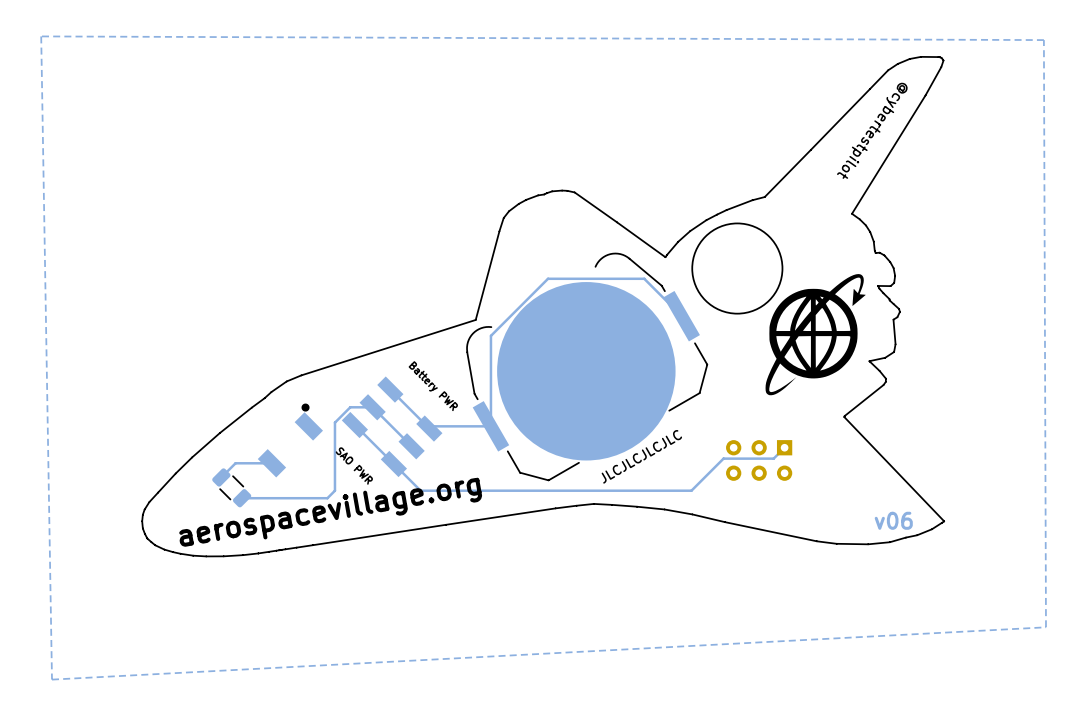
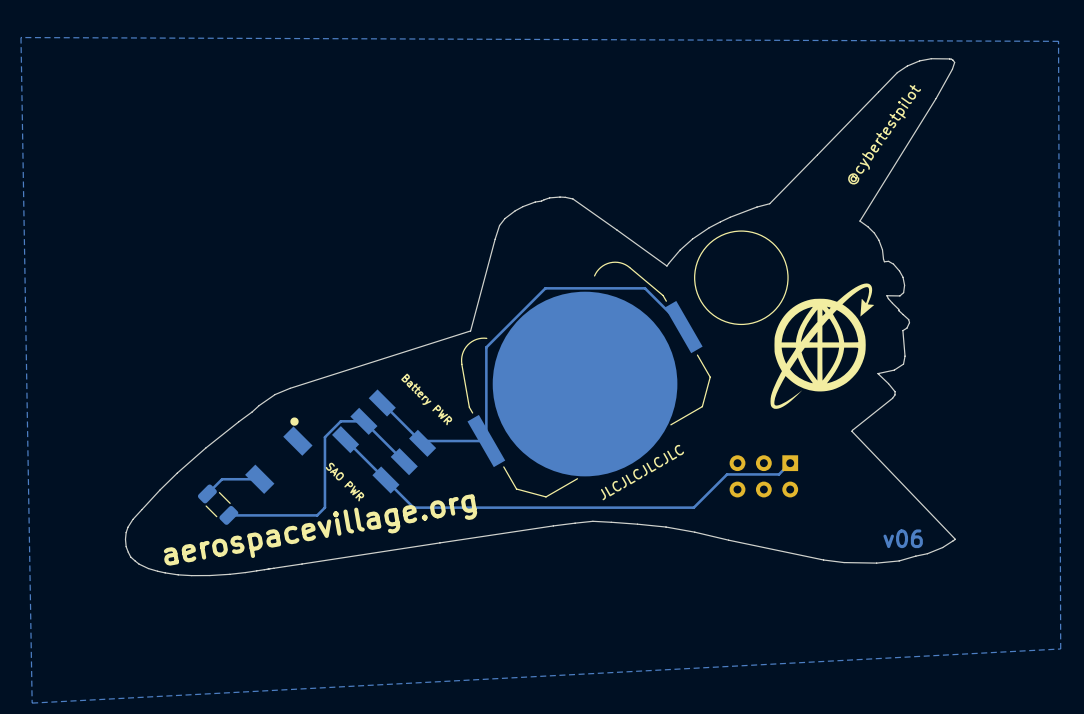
text rotation: 0° (872, 130) -> 180° (884, 134)

